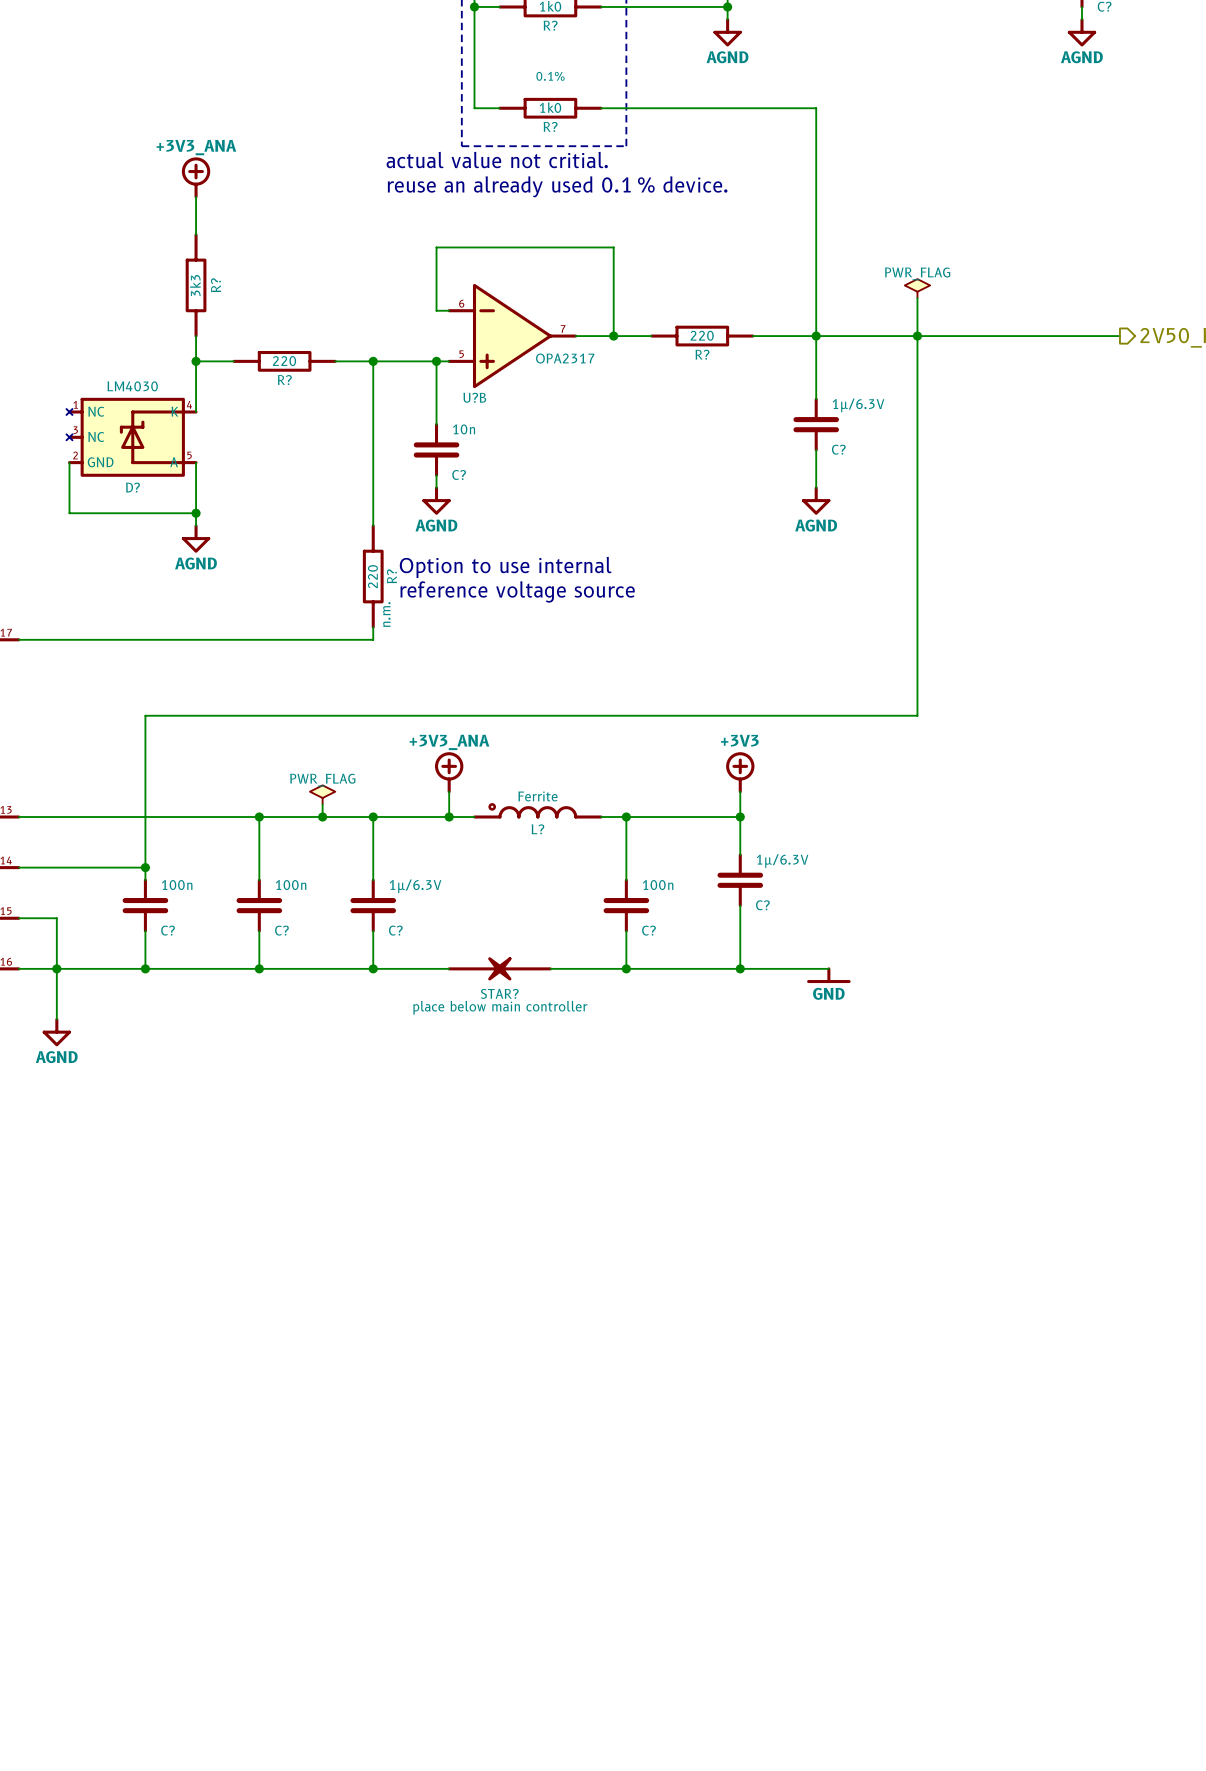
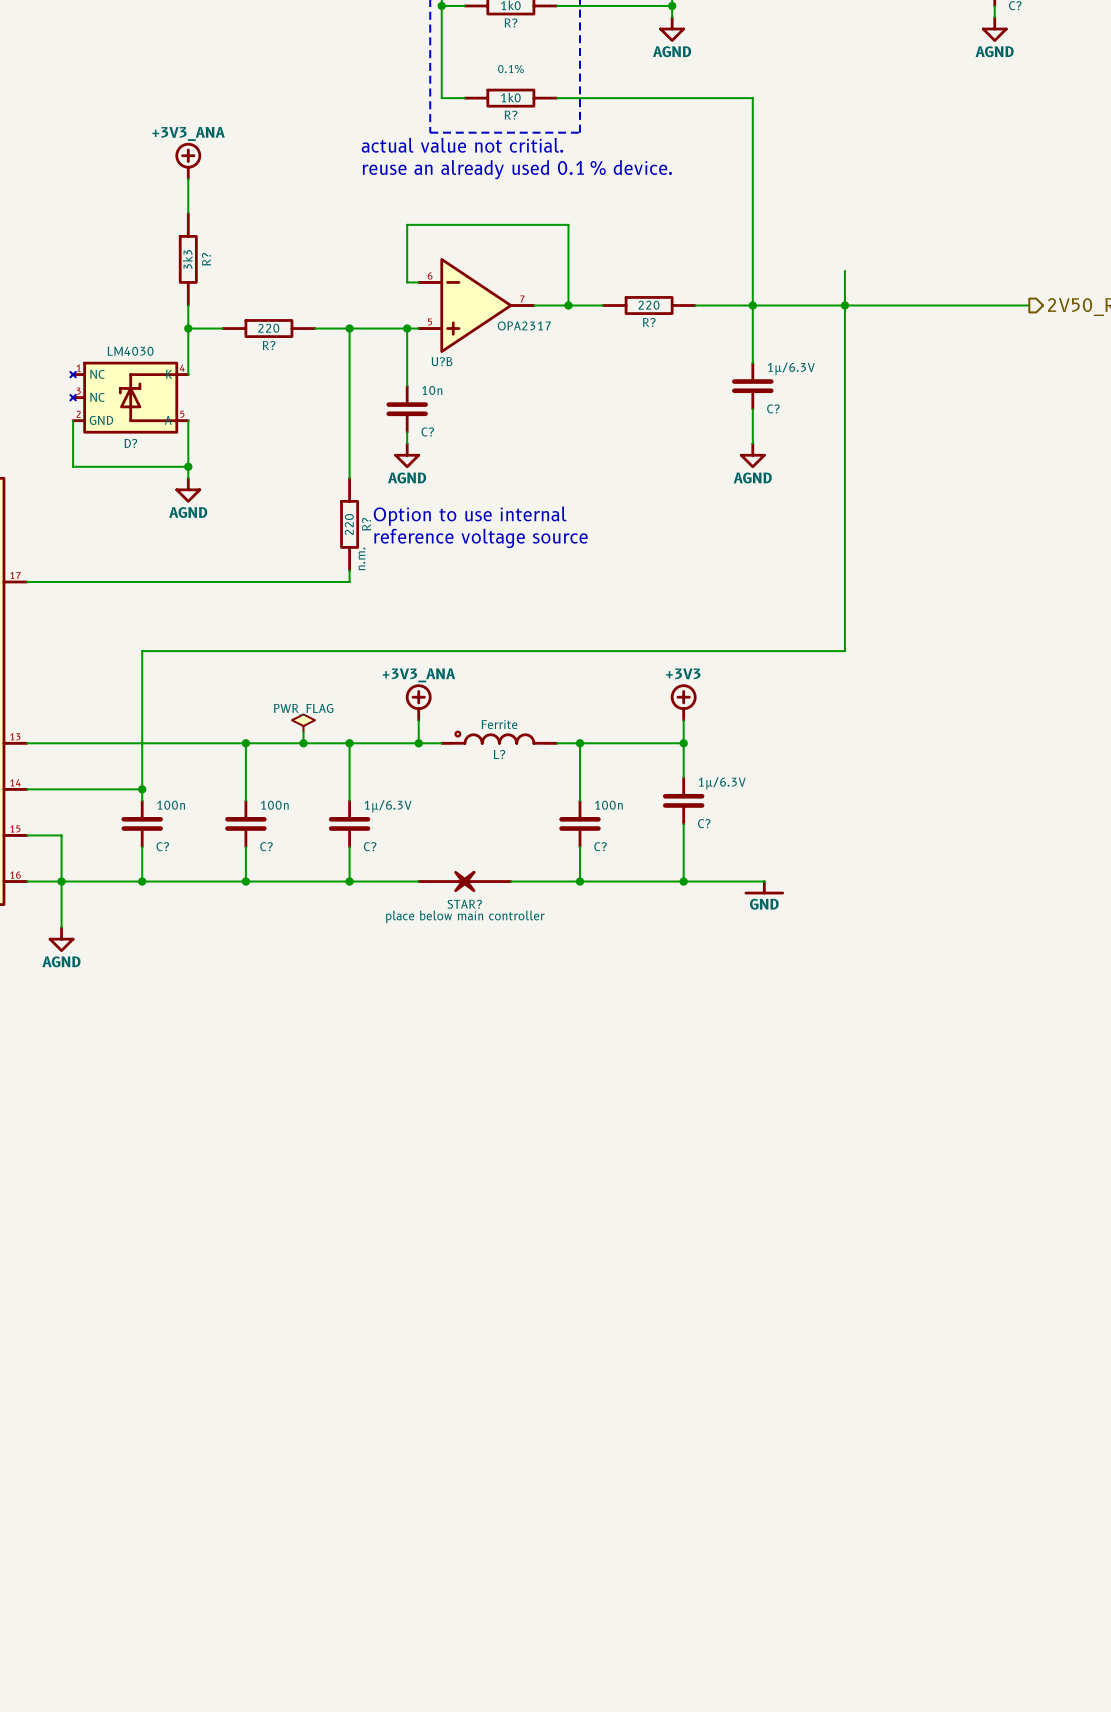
power symbol: PWR_FLAG (917, 288) -> none

